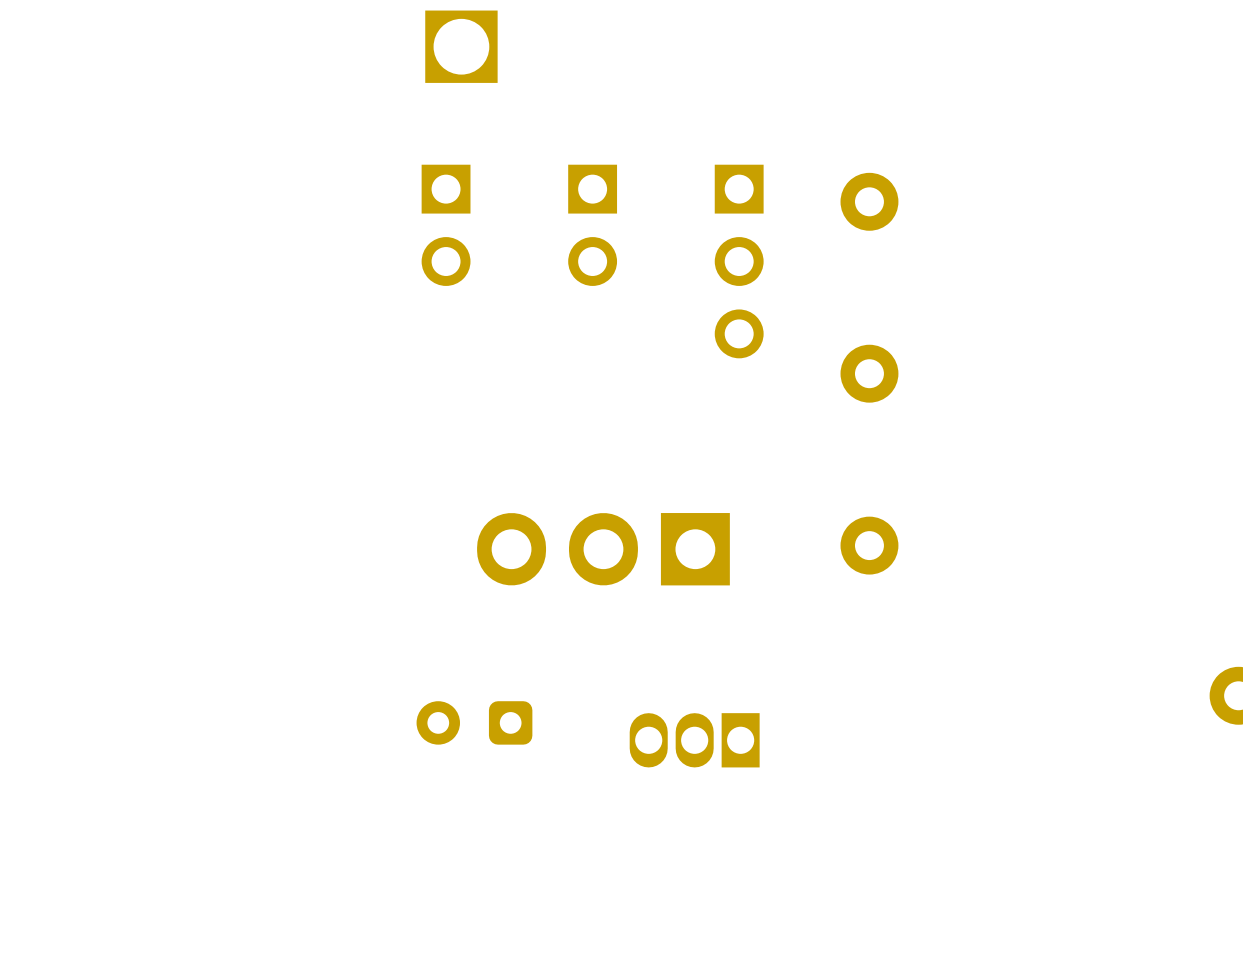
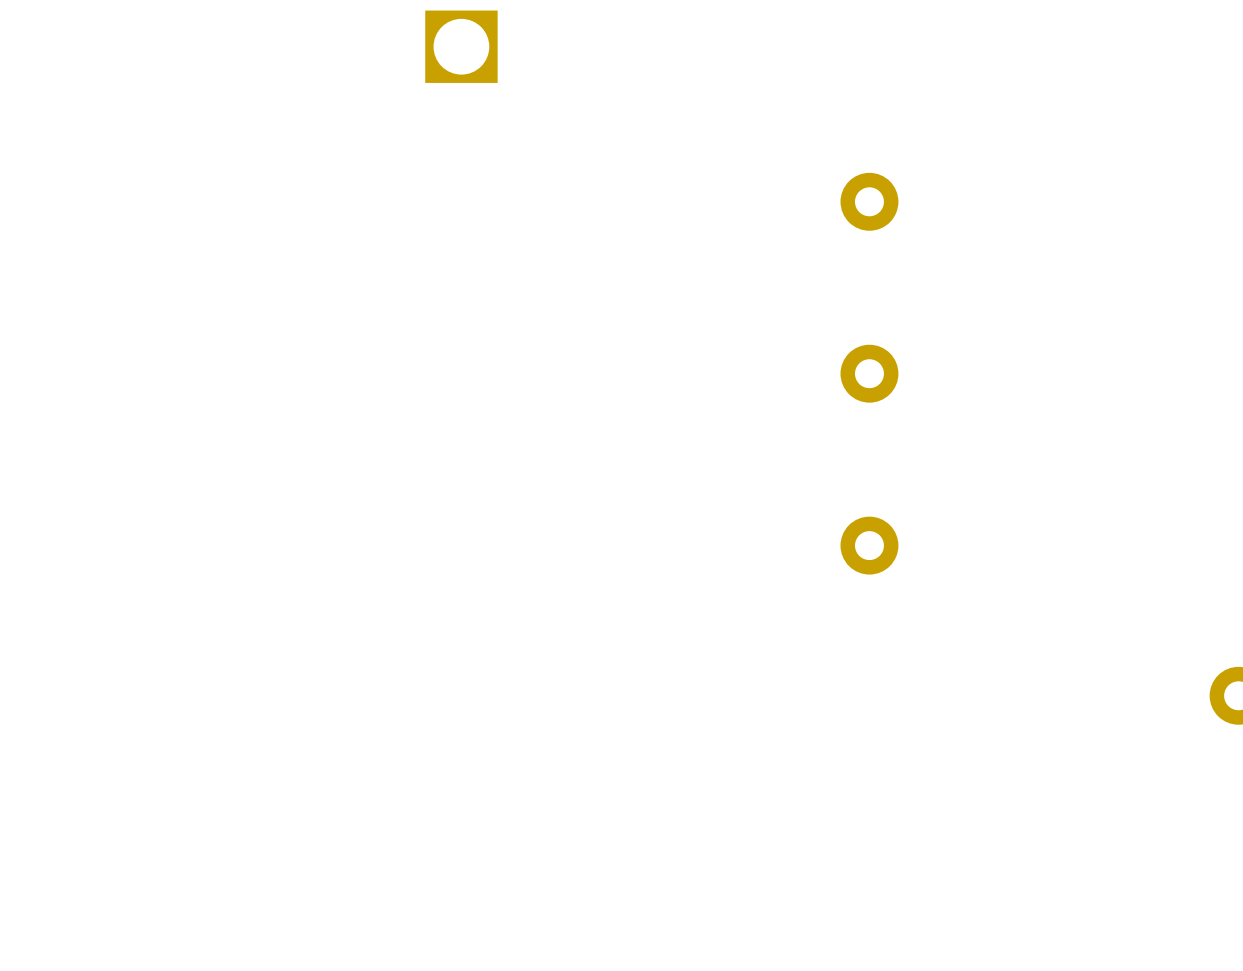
part: (446, 225) -> none
part: (592, 225) -> none
part: (739, 261) -> none
part: (603, 549) -> none
part: (474, 722) -> none
part: (694, 740) -> none

